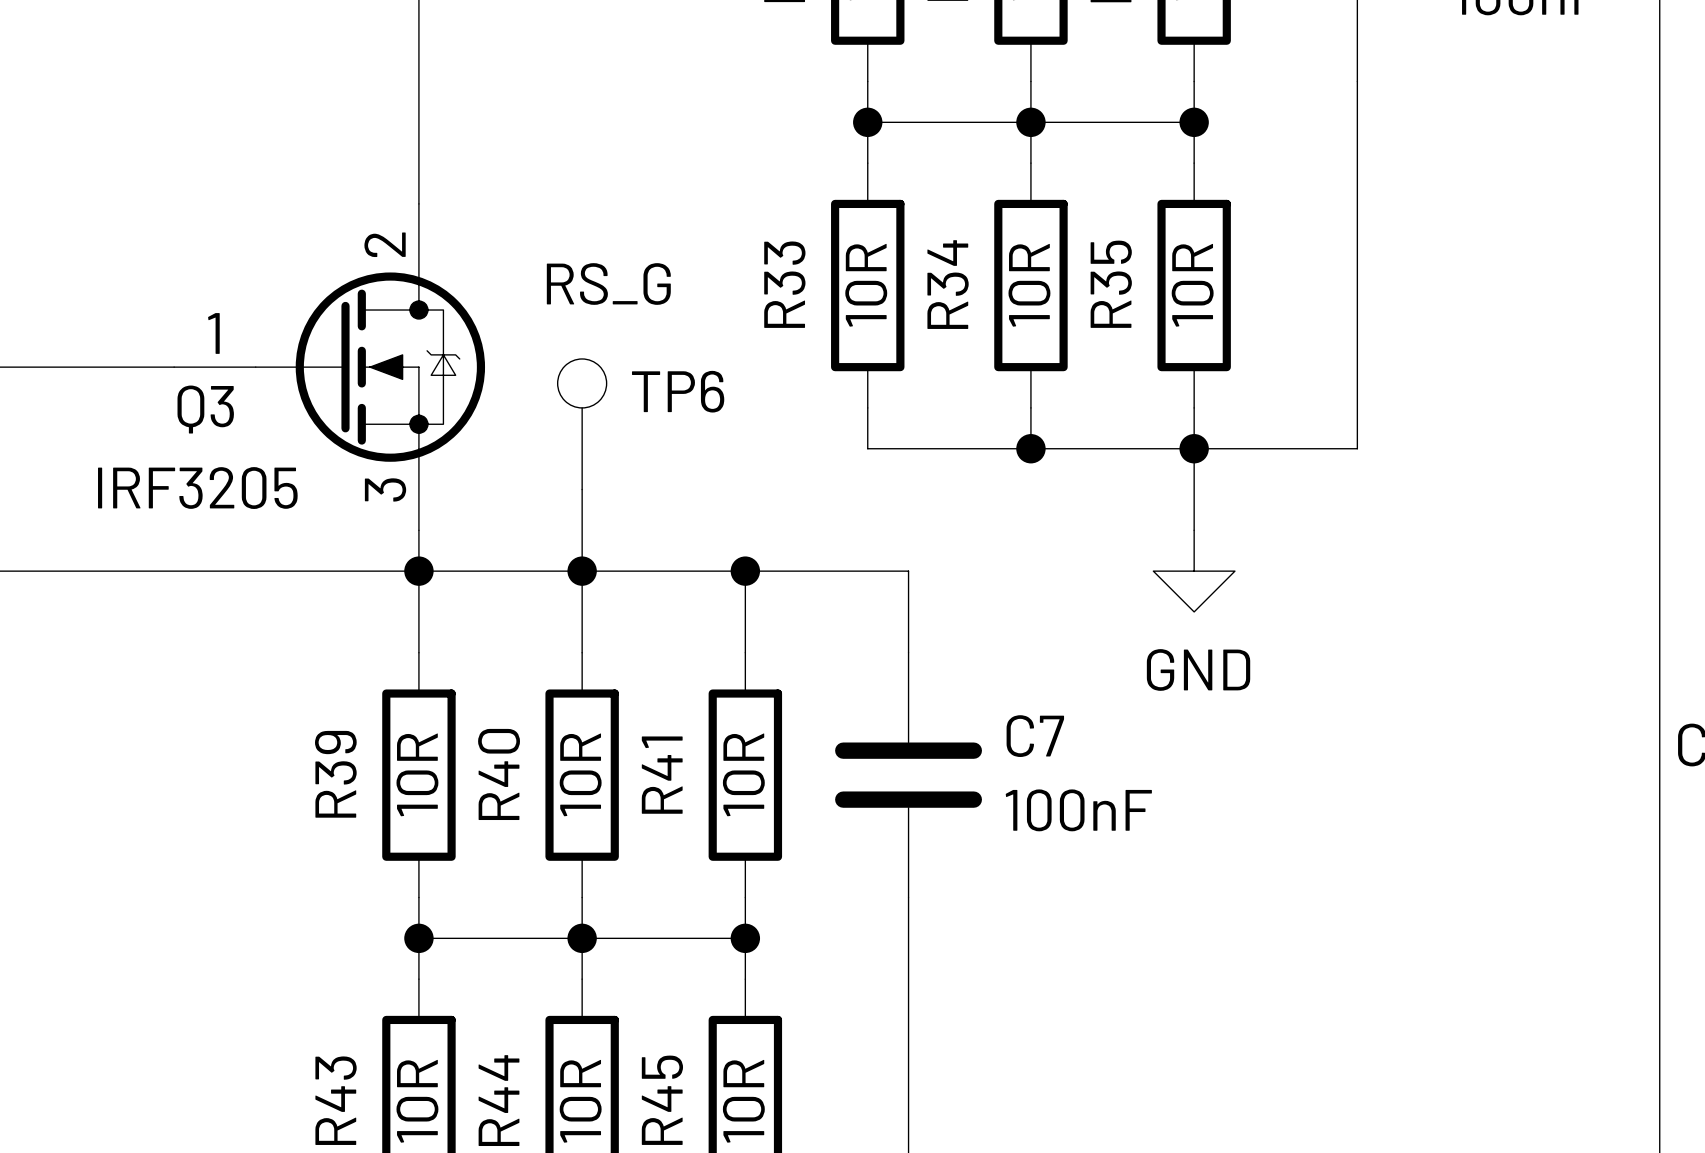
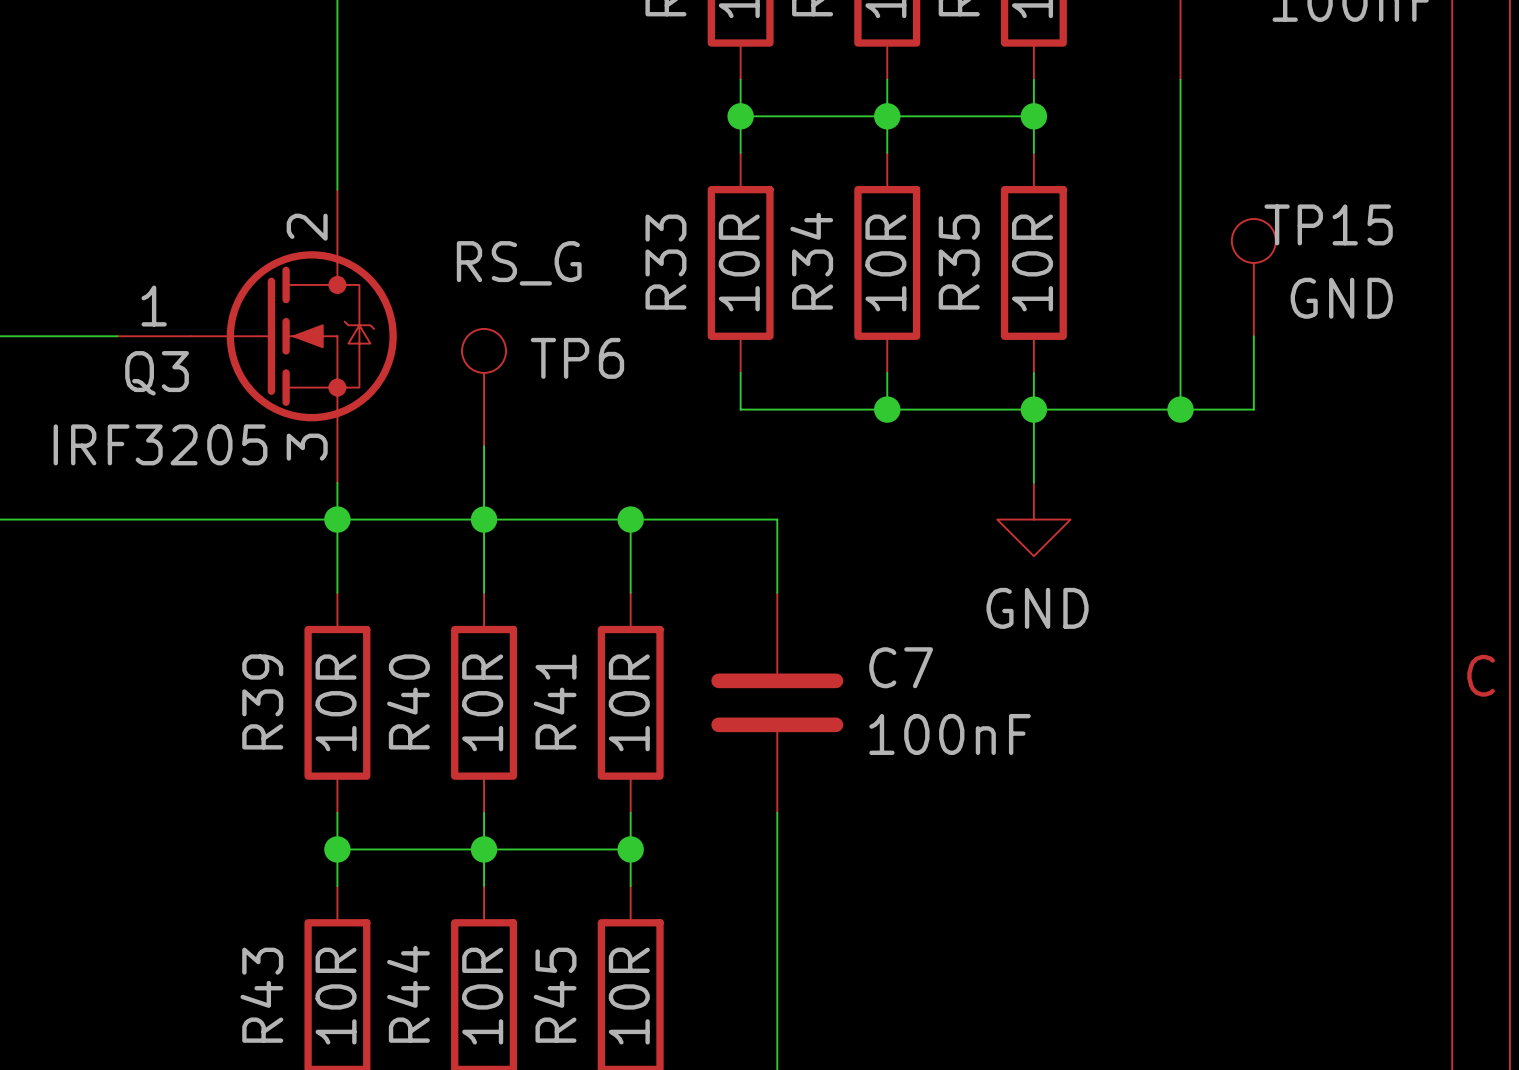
TP15: none -> GND (1253, 277)
wire: none -> (1253, 336) (1253, 409) (1180, 409)
junction: none -> (1180, 409)

